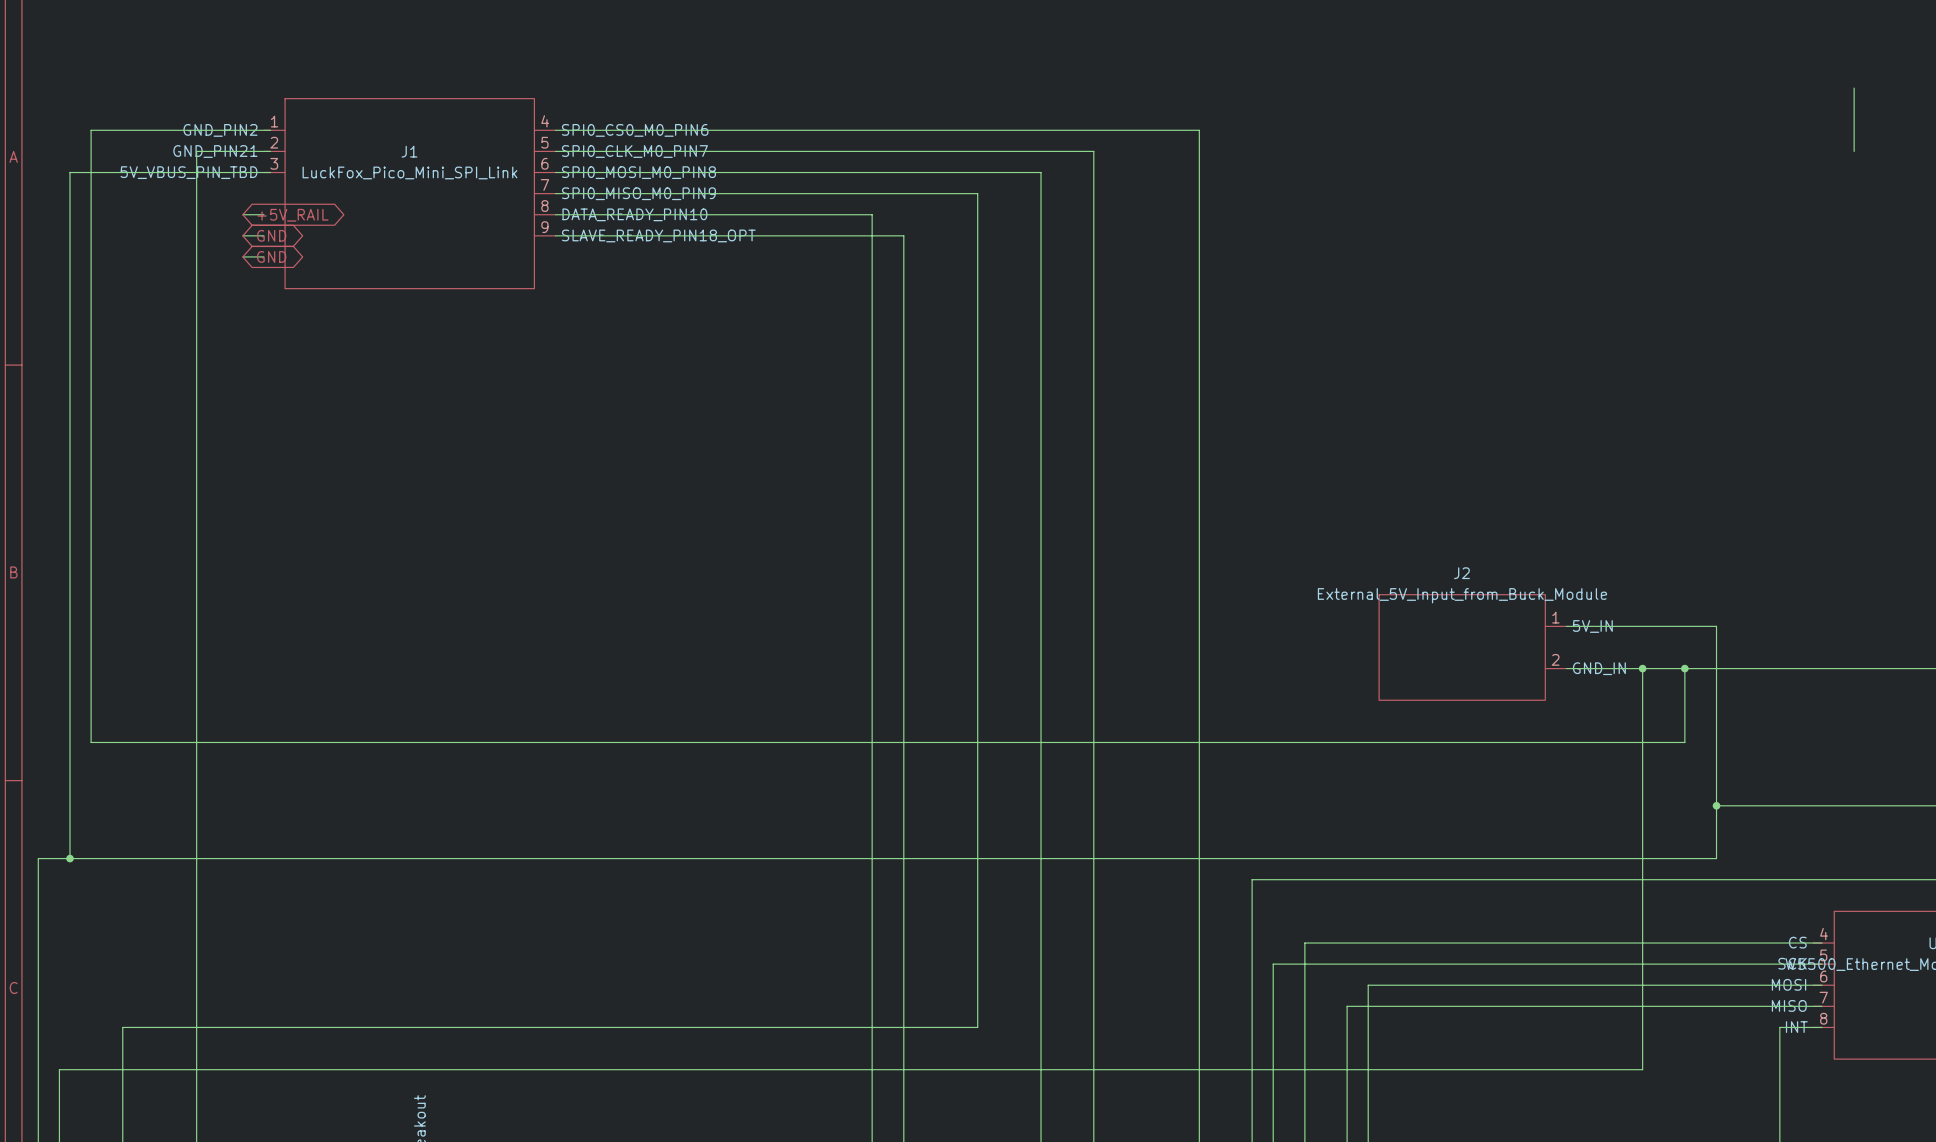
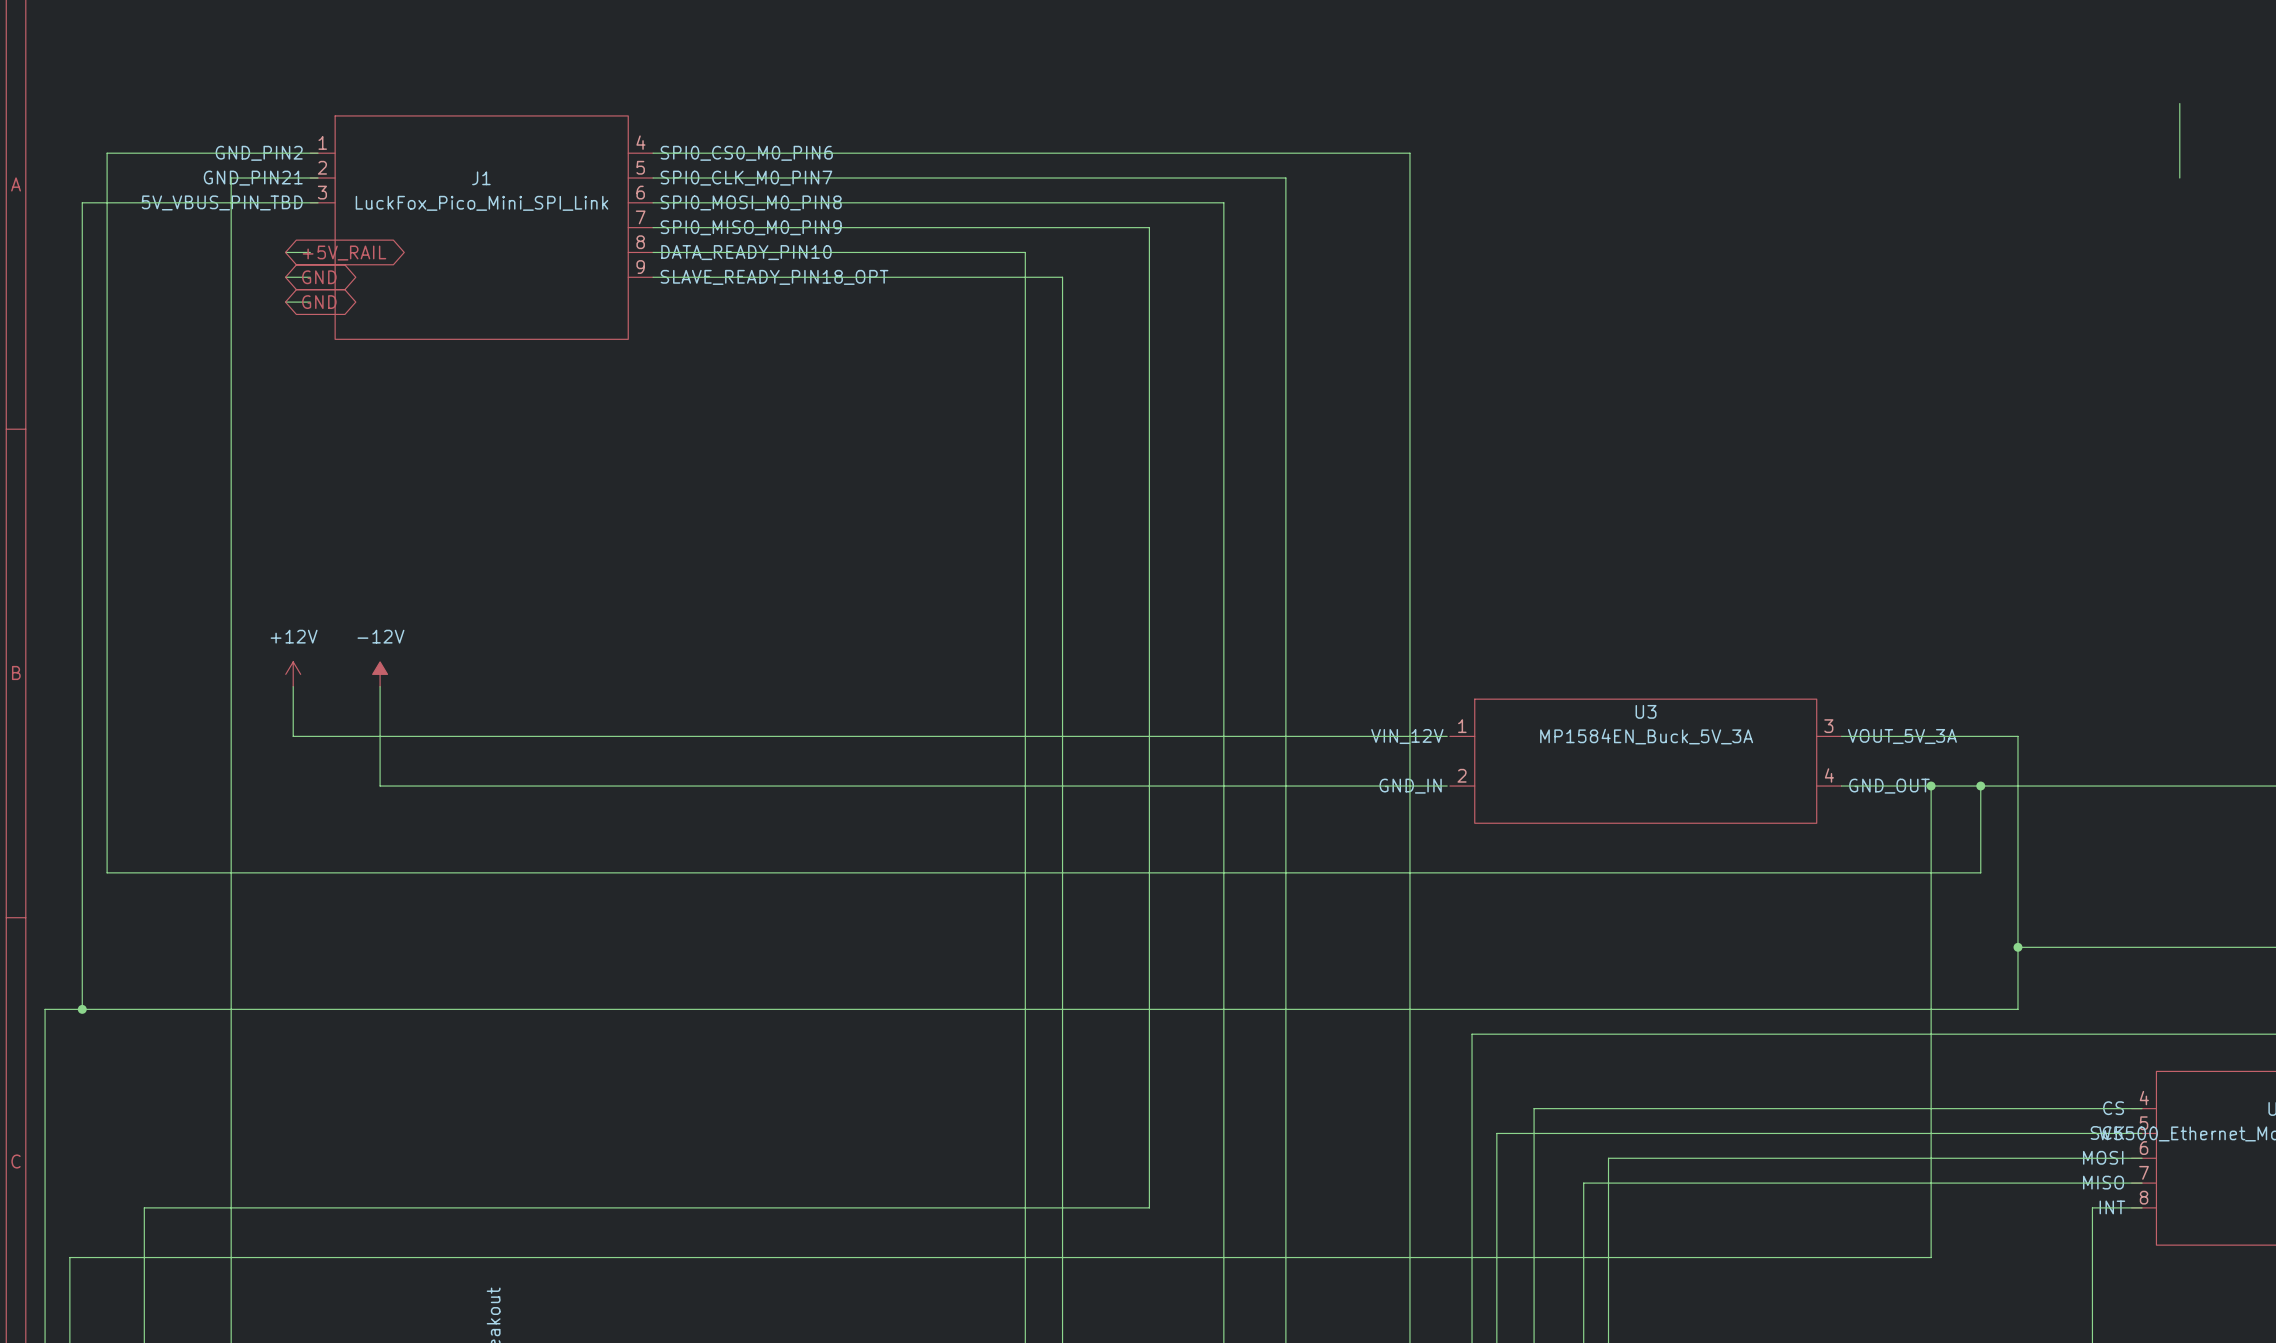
power symbol: none -> +12V (293, 674)
power symbol: none -> -12V (380, 674)
wire: none -> (293, 686) (293, 736) (1447, 736)
wire: none -> (380, 686) (380, 786) (1447, 786)
U3: none -> MP1584EN_Buck_5V_3A (1645, 761)
J2: External_5V_Input_from_Buck_Module (1472, 647) -> none

